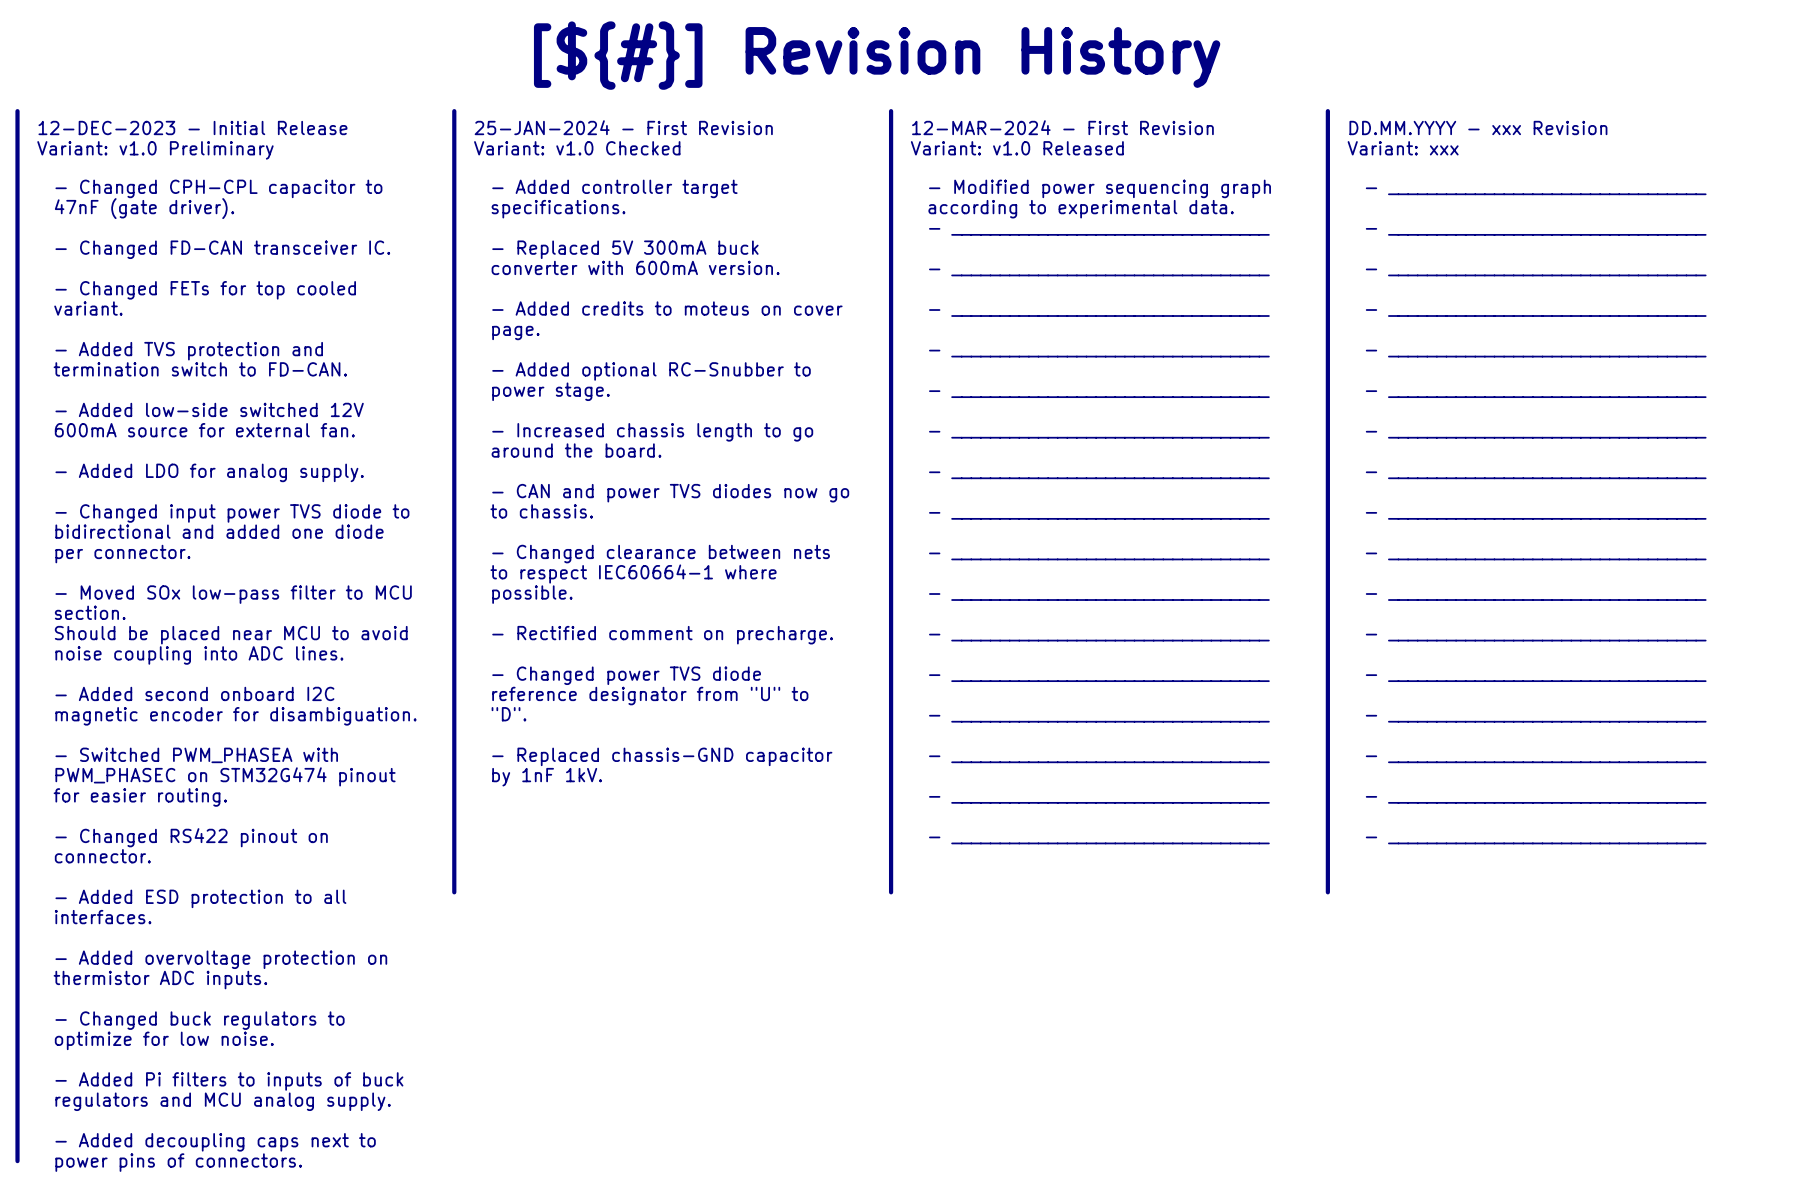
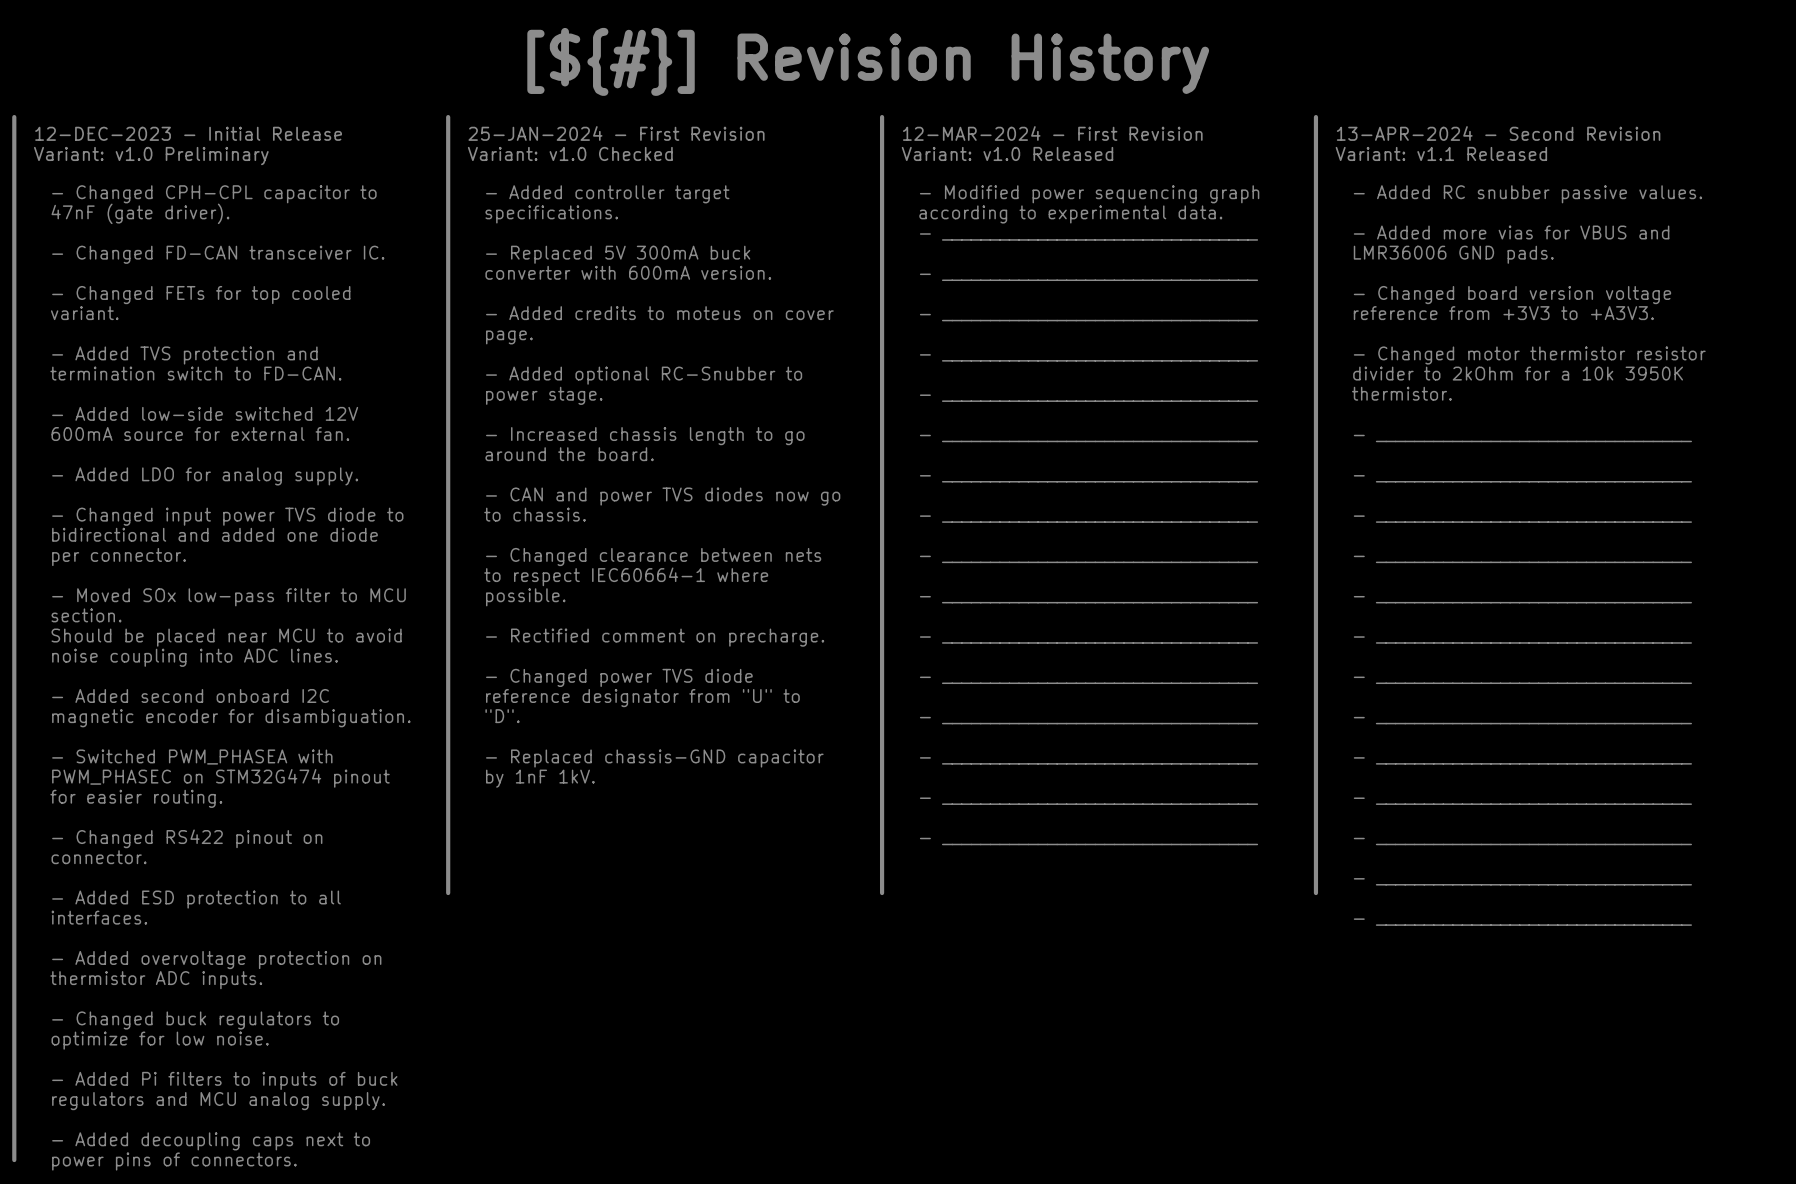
text: DD.MM.YYYY - xxx Revision (1478, 127) -> 13-APR-2024 - Second Revision (1498, 133)
text: Variant: xxx (1403, 148) -> Variant: v1.1 Released (1441, 153)
text: - _________________________________ (1536, 191) -> - Added RC snubber passive values. (1527, 194)
text: - _________________________________ (1536, 231) -> - Added more vias for VBUS and (1511, 232)
text: none -> LMR36006 GND pads. (1453, 254)
text: - _________________________________ (1536, 272) -> none
text: none -> - Changed board version voltage (1512, 295)
text: - _________________________________ (1536, 313) -> reference from +3V3 to +A3V3. (1503, 313)
text: - _________________________________ (1536, 353) -> - Changed motor thermistor resistor (1529, 355)
text: none -> divider to 2kOhm for a 10k 3950K (1518, 373)
text: - _________________________________ (1536, 394) -> thermistor. (1401, 393)
text: none -> - _________________________________ (1522, 881)
text: none -> - _________________________________ (1522, 922)

